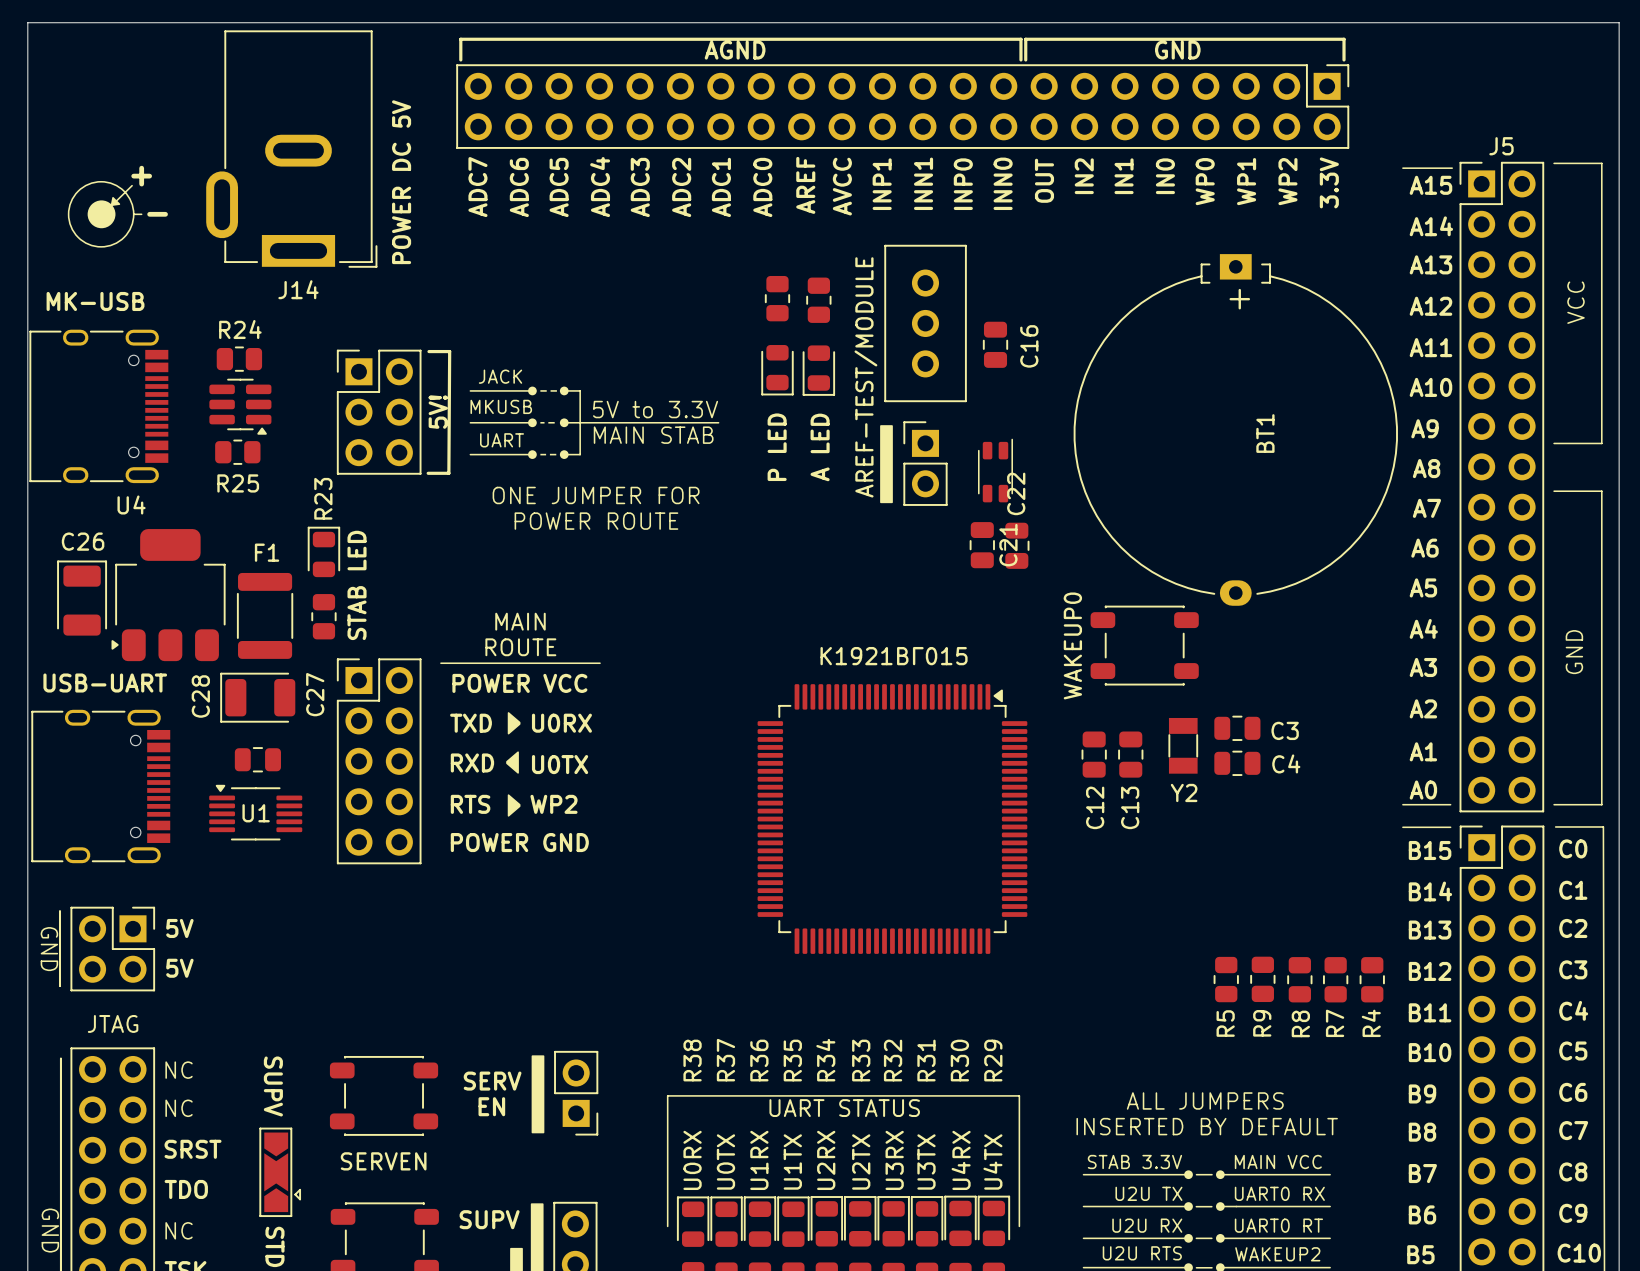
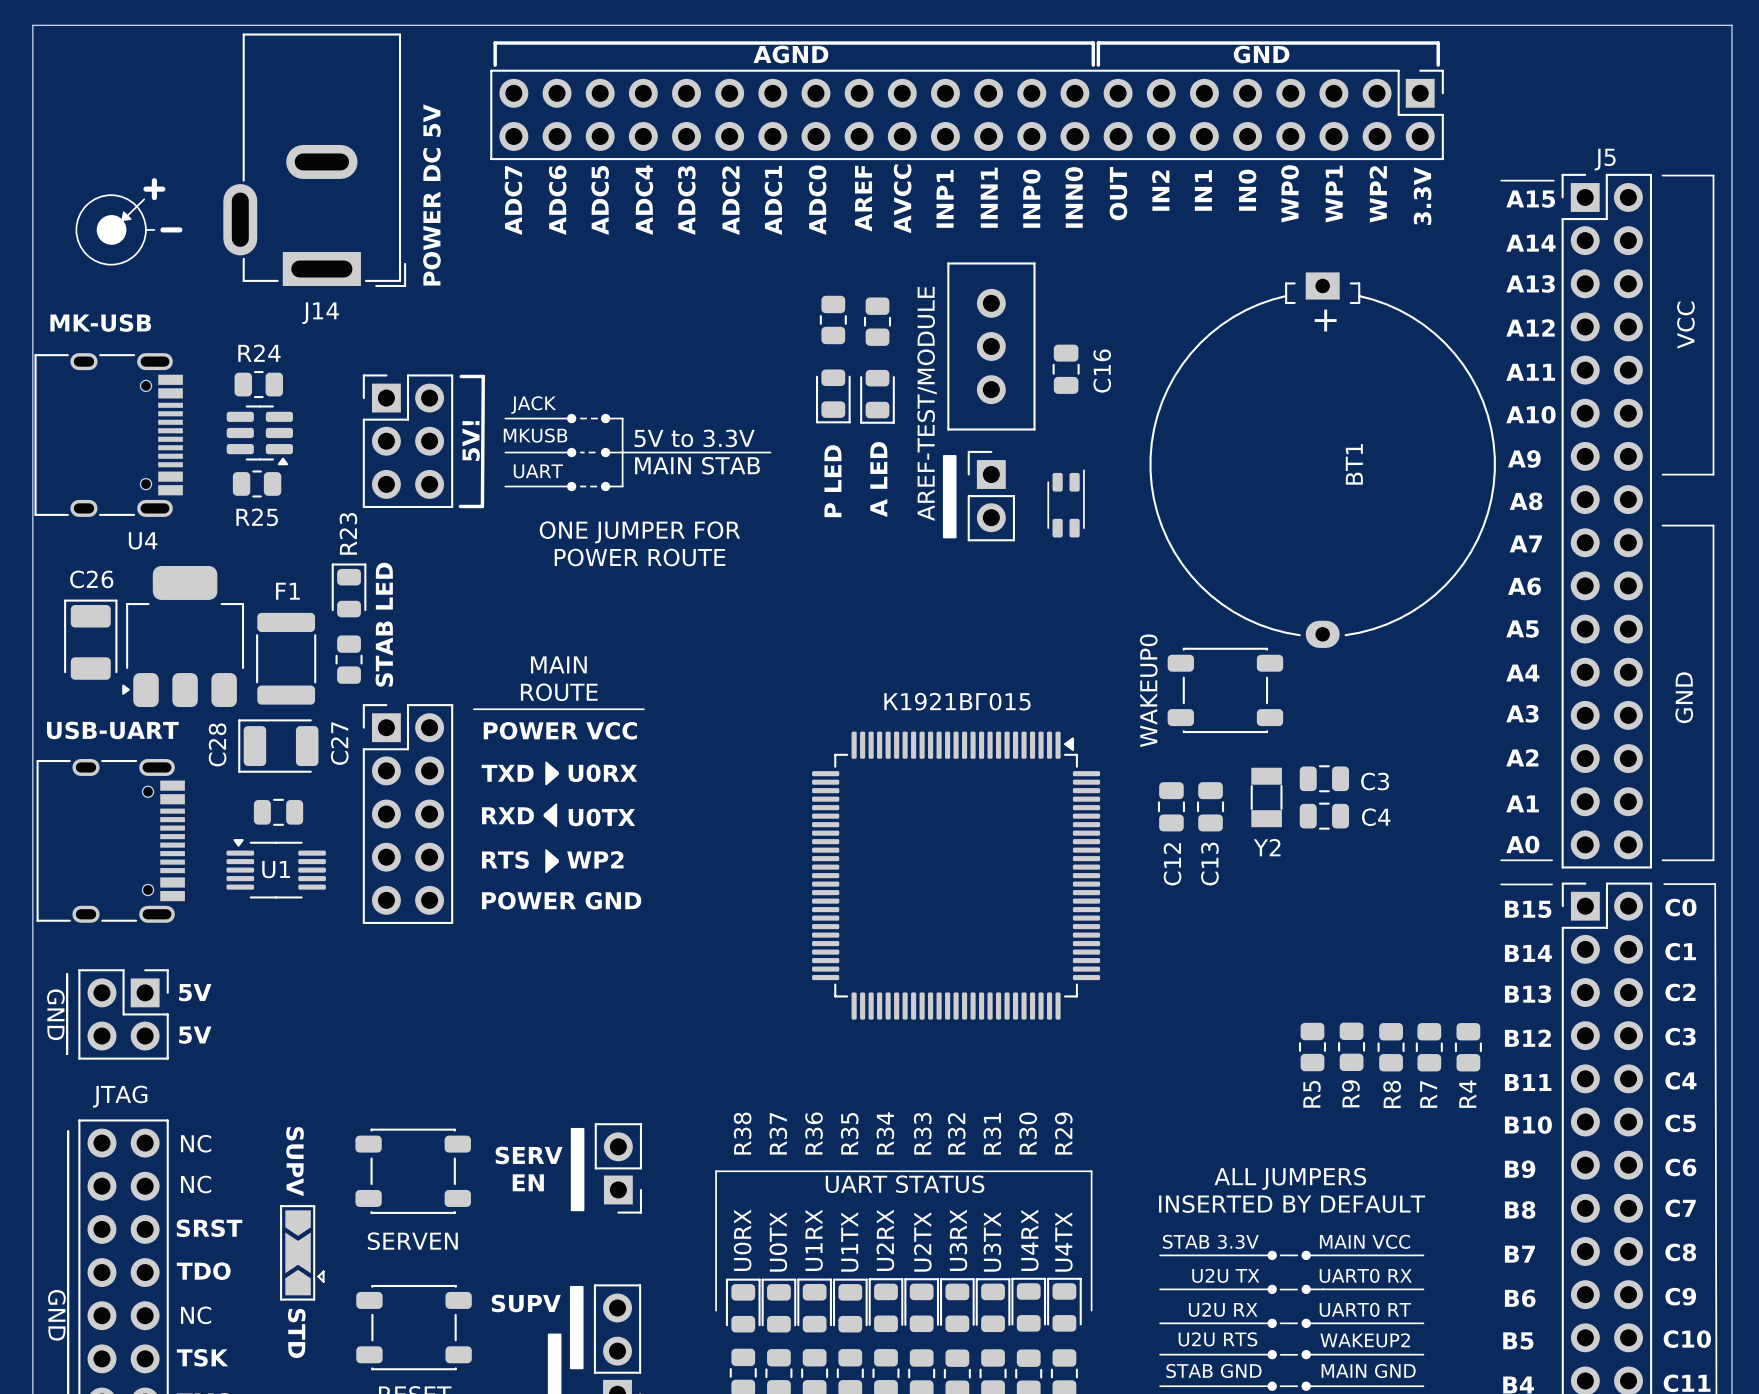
C21: (982, 545) -> none
C22: (1016, 545) -> none

